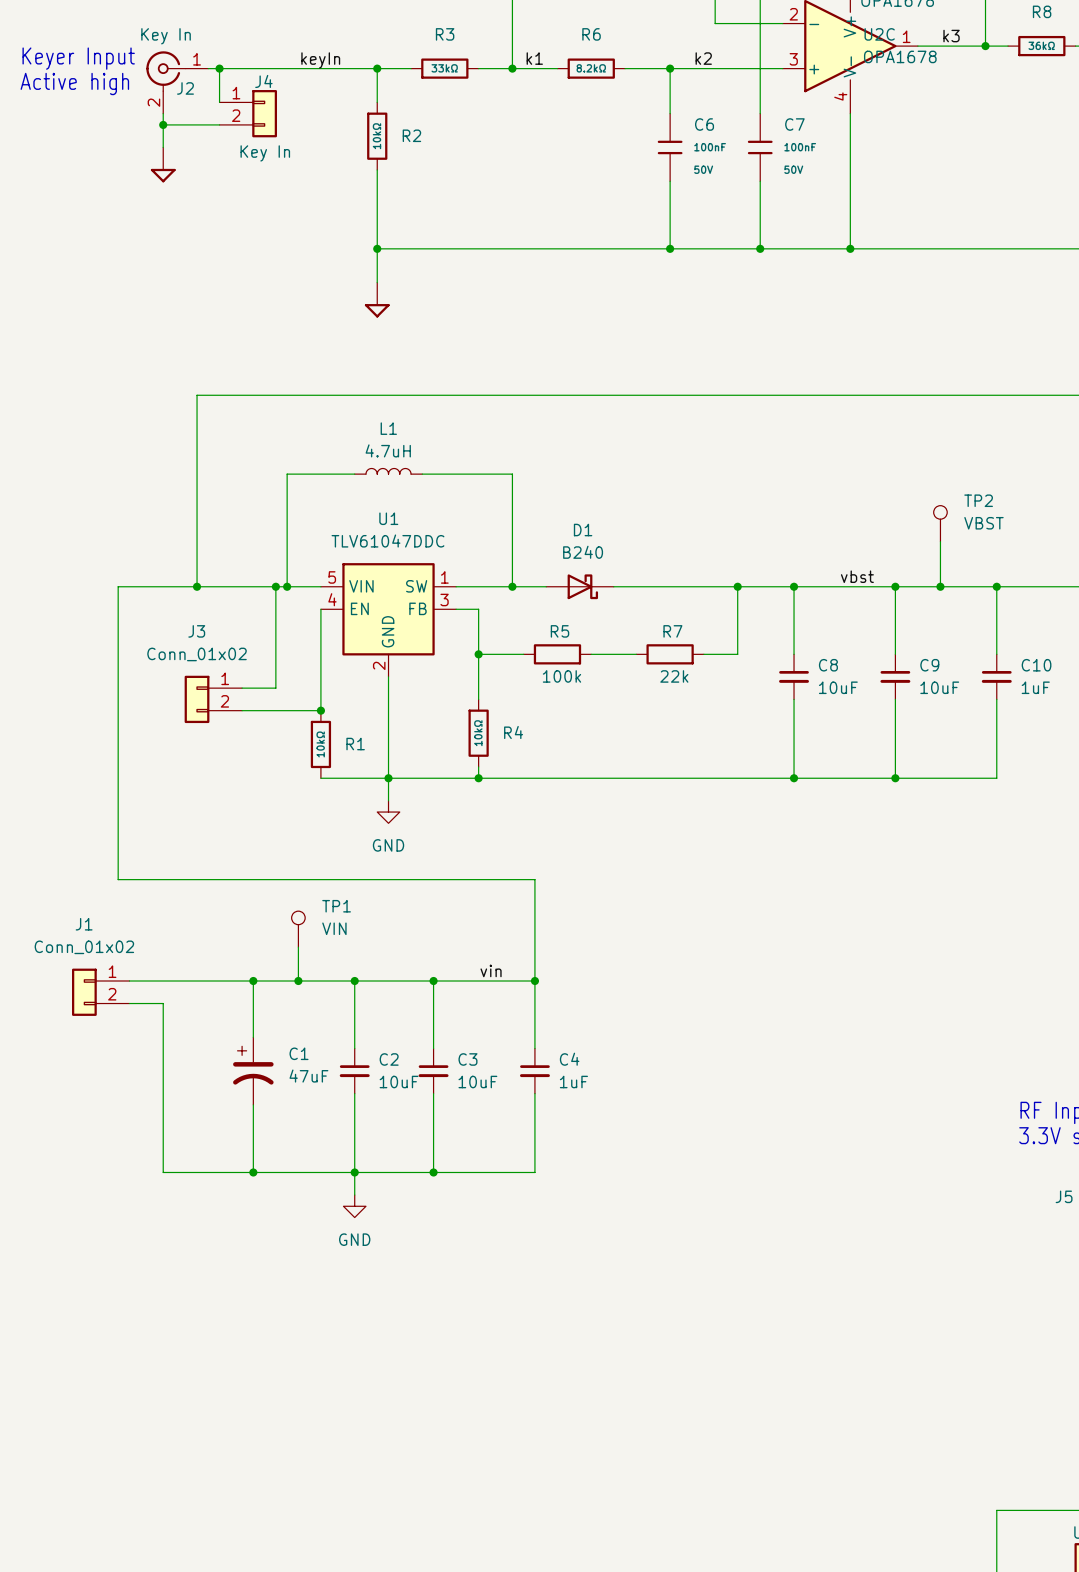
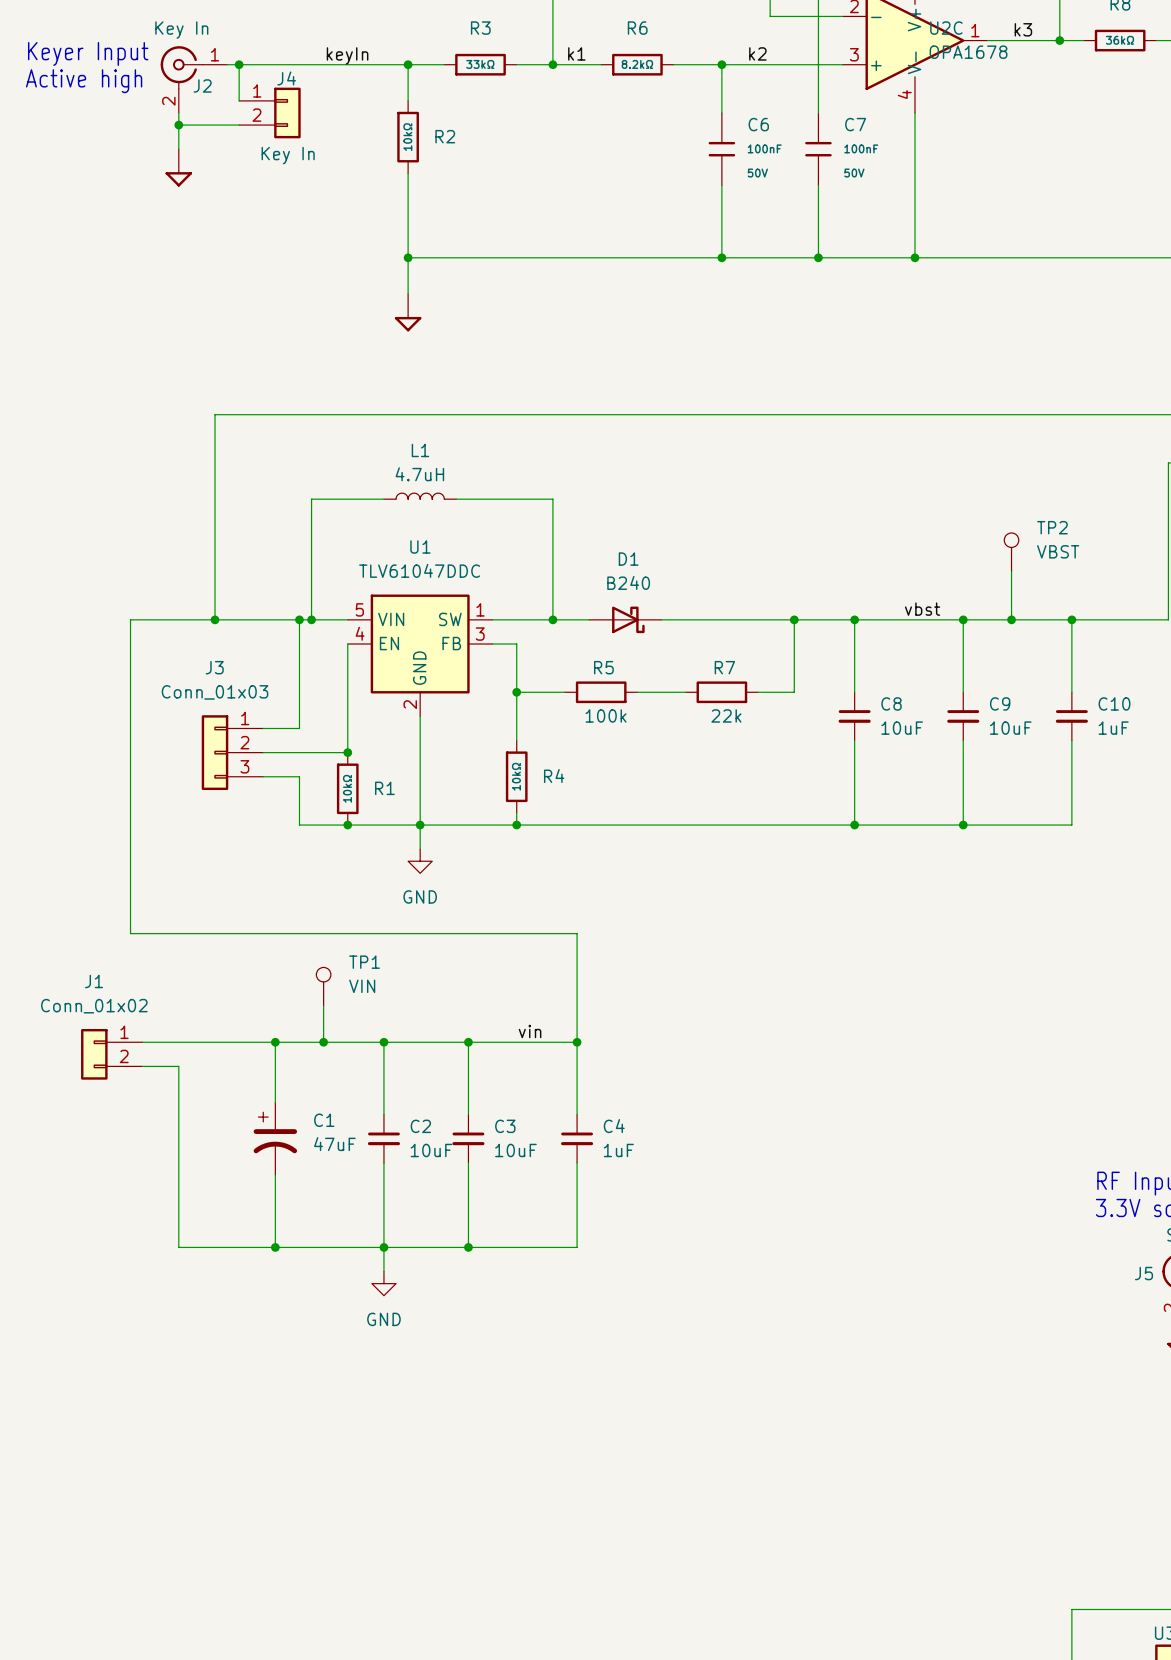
J3 value: Conn_01x02 (197, 654) -> Conn_01x03 (215, 692)
J3 symbol: [184, 675, 243, 724] -> [201, 715, 264, 791]
wire: none -> (263, 776) (299, 776) (299, 825) (347, 825)
junction: none -> (347, 825)

